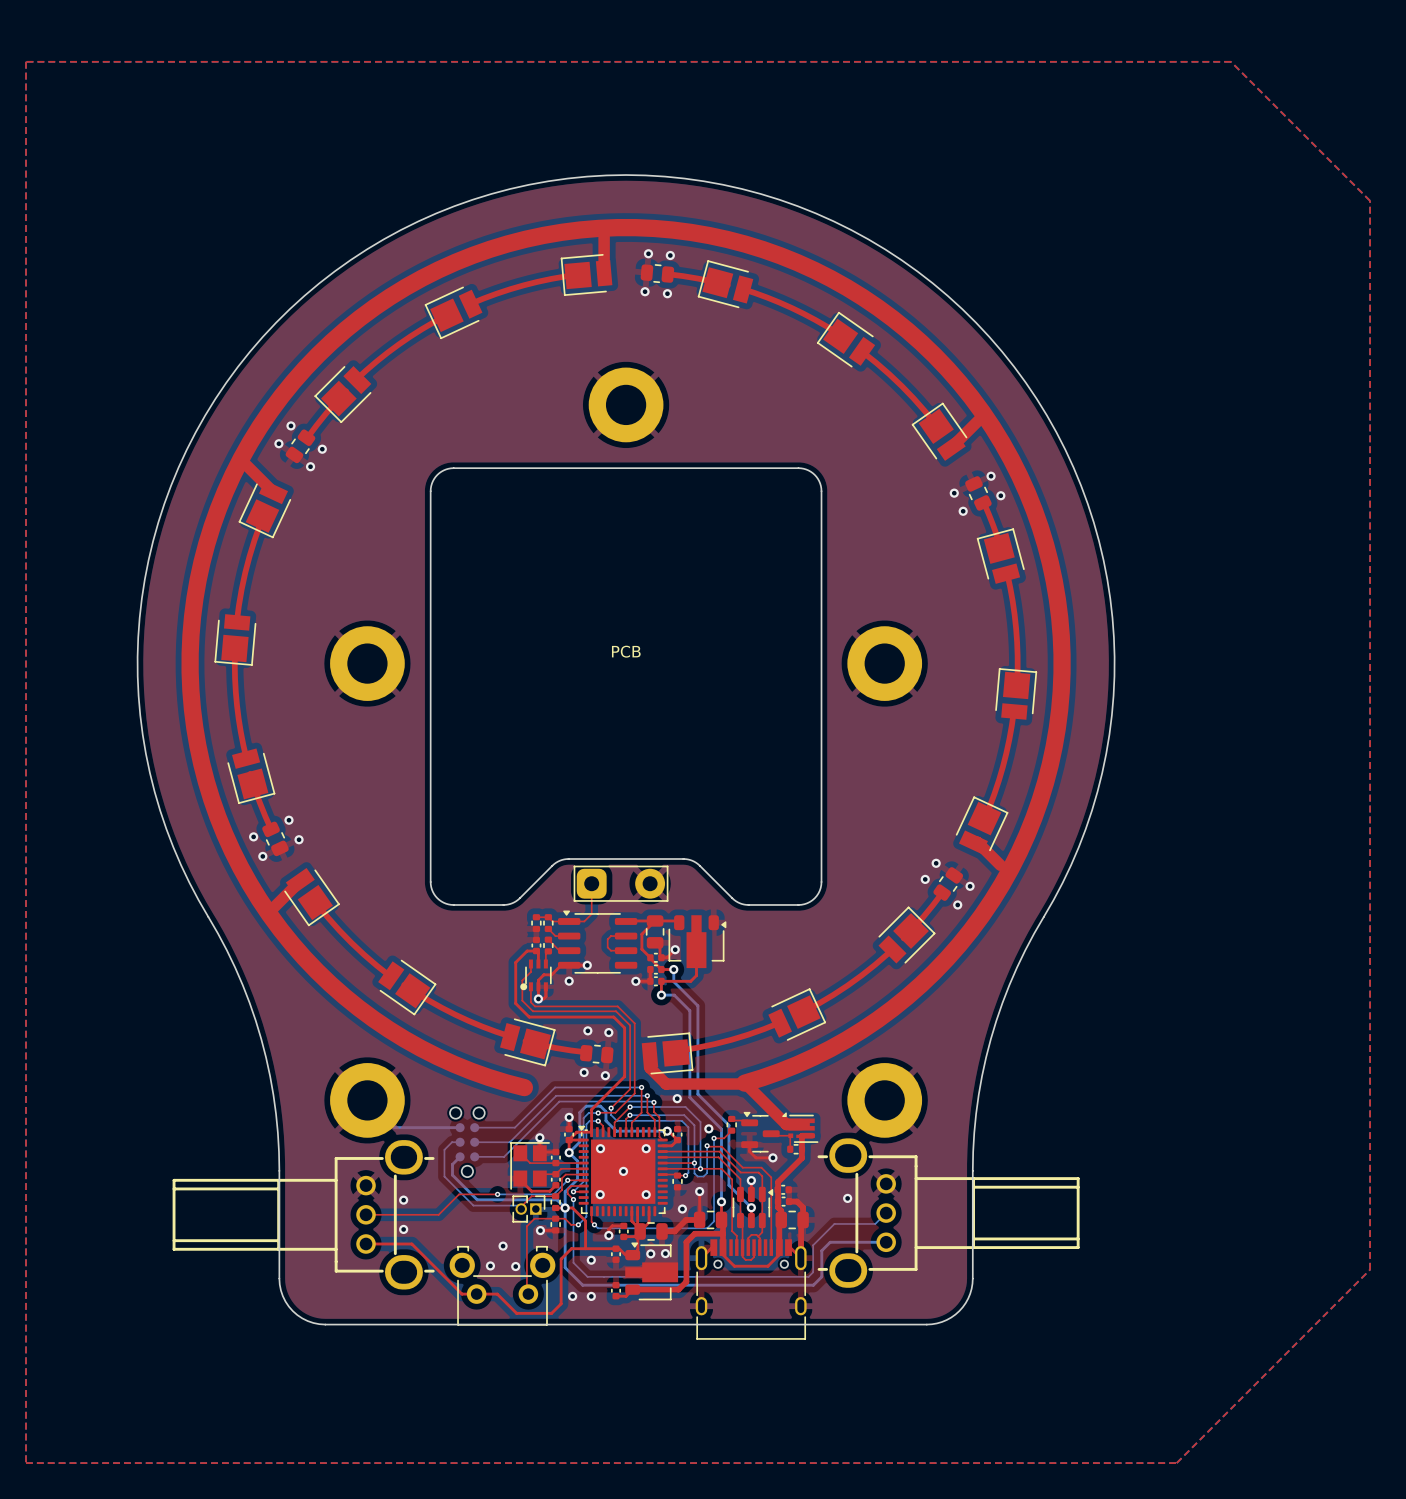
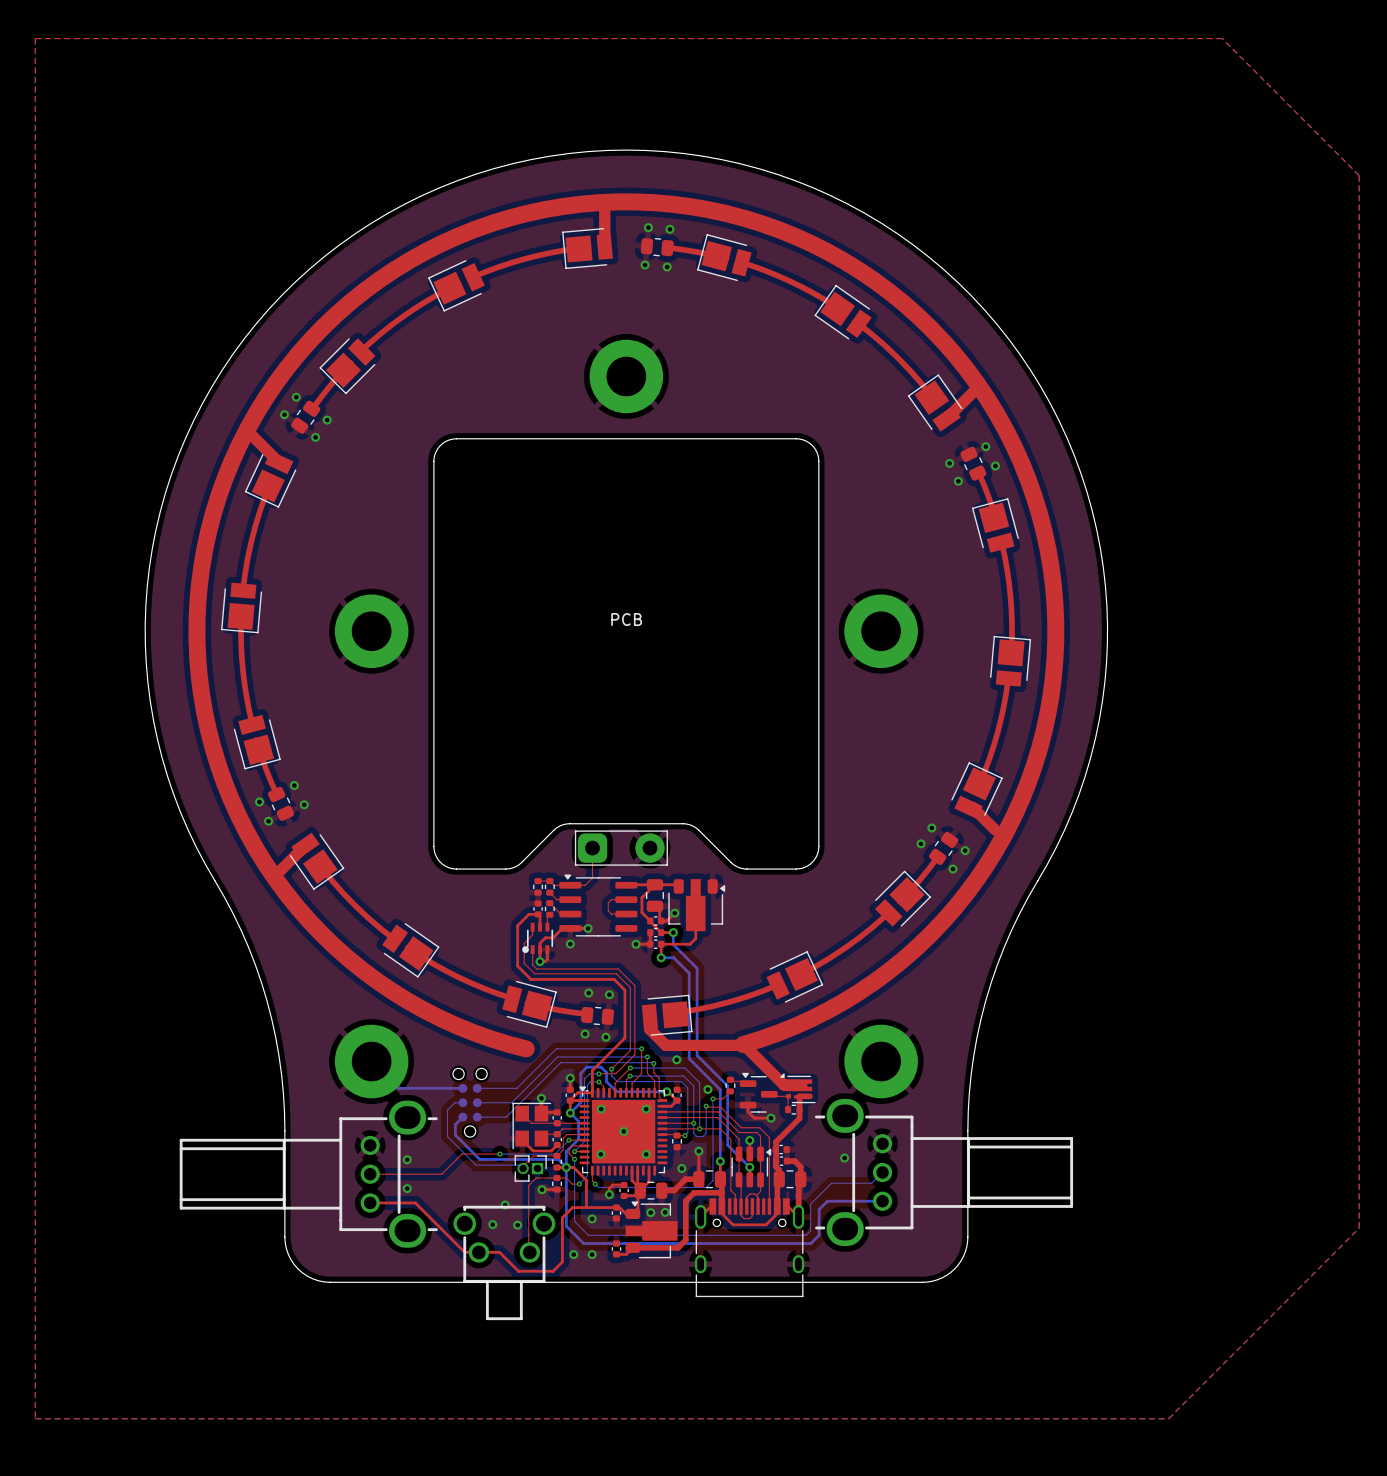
part: (502, 1285) -> none
part: none -> (504, 1262)

